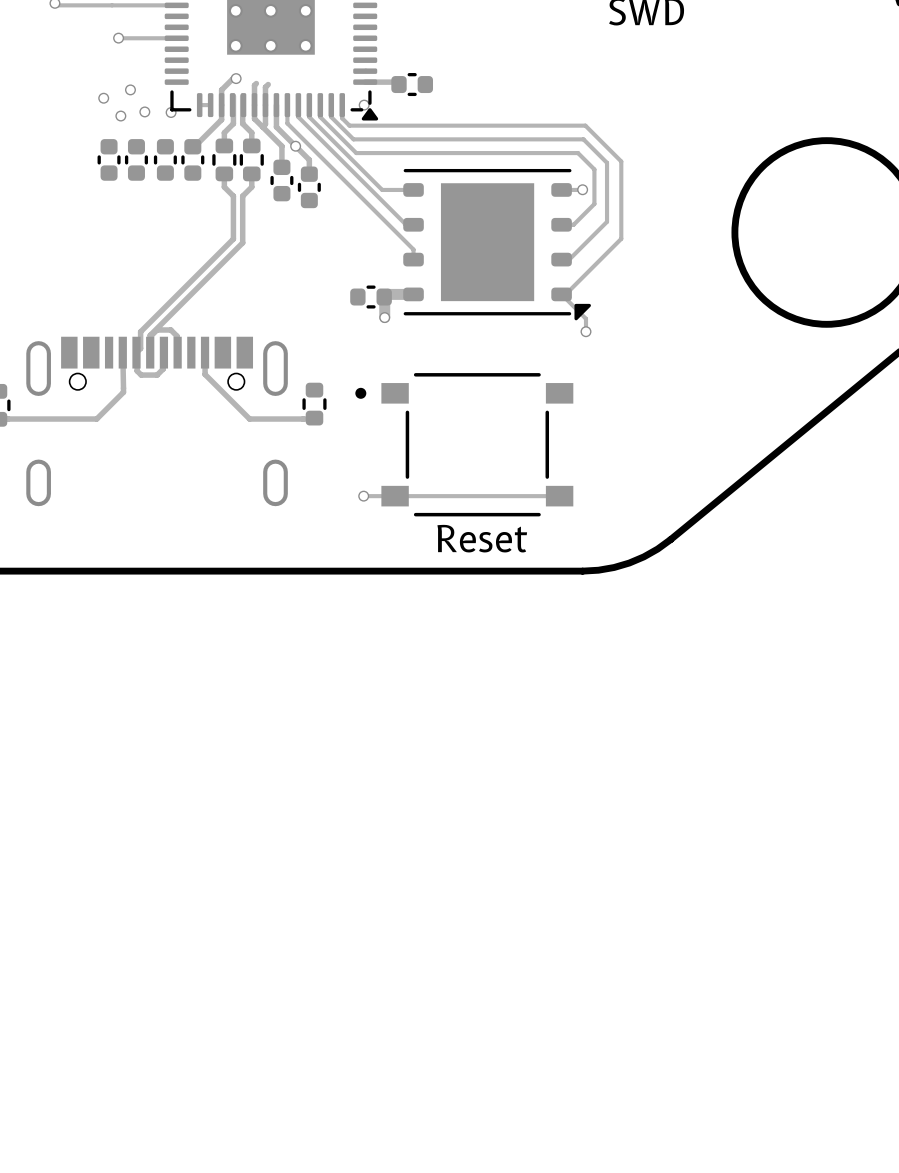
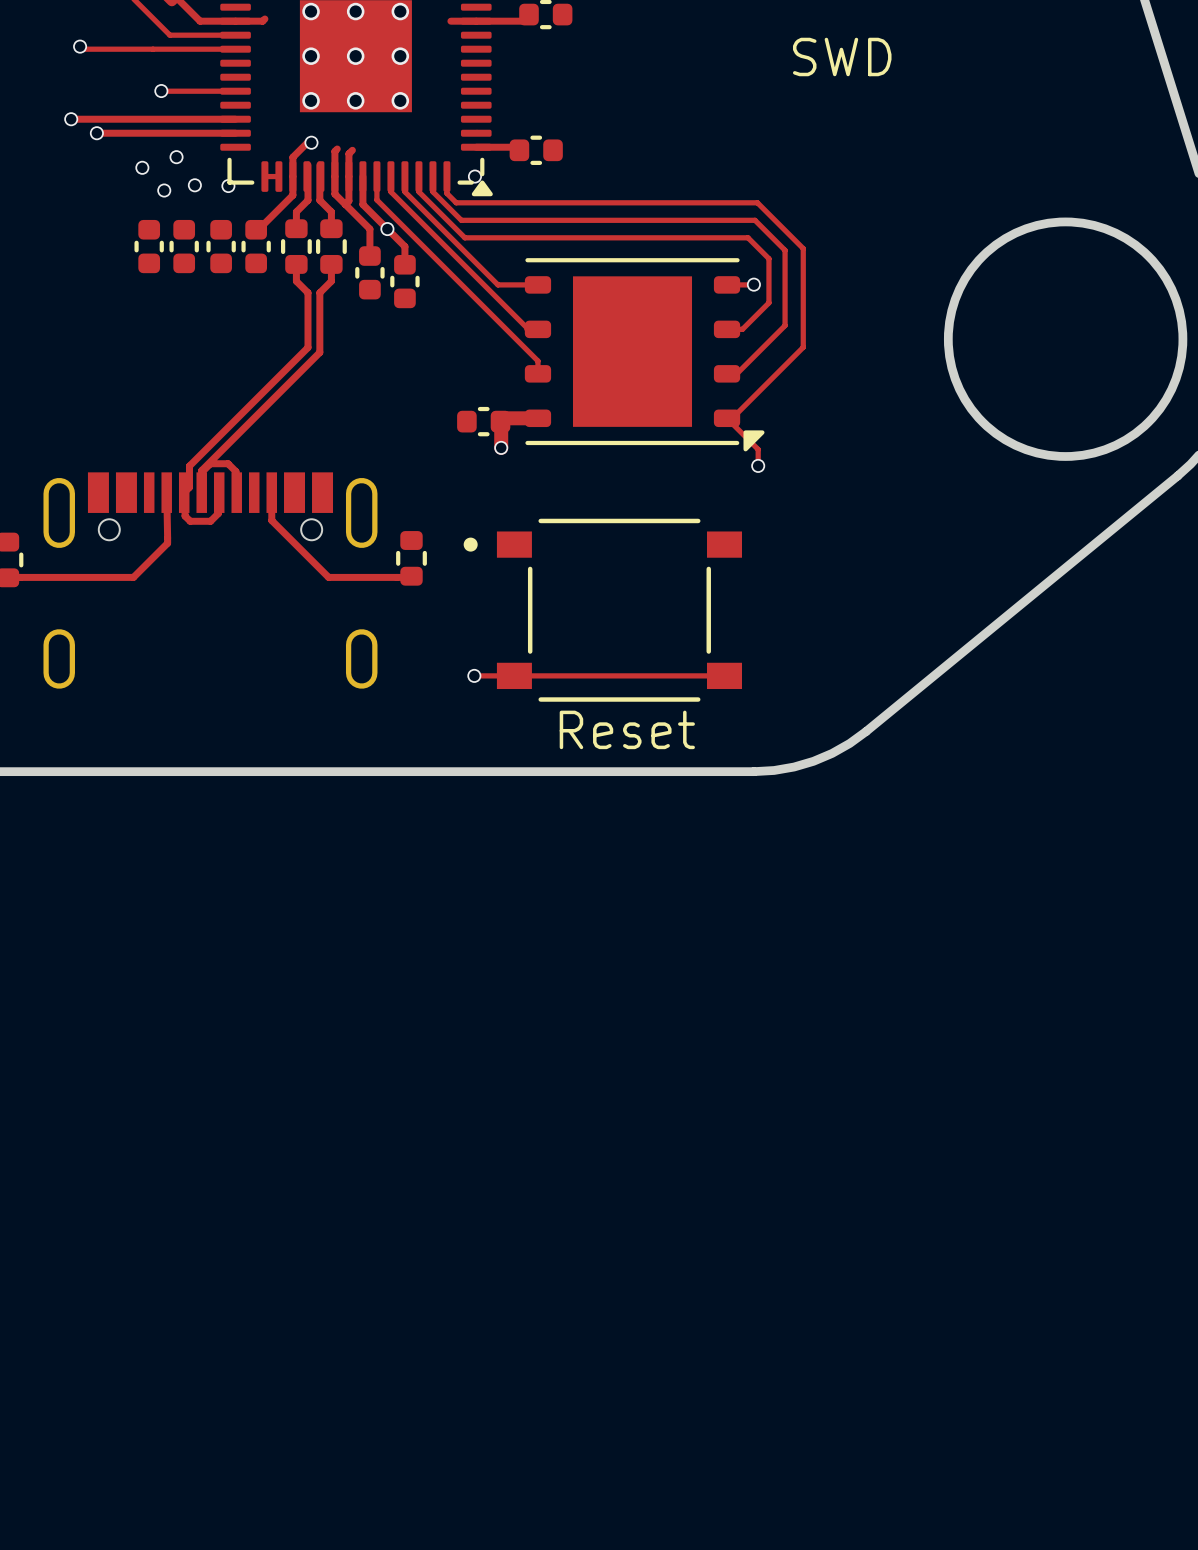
track: none -> (71, 119) (235, 119)
via: none -> (71, 119)
track: none -> (96, 133) (235, 133)
via: none -> (96, 133)

